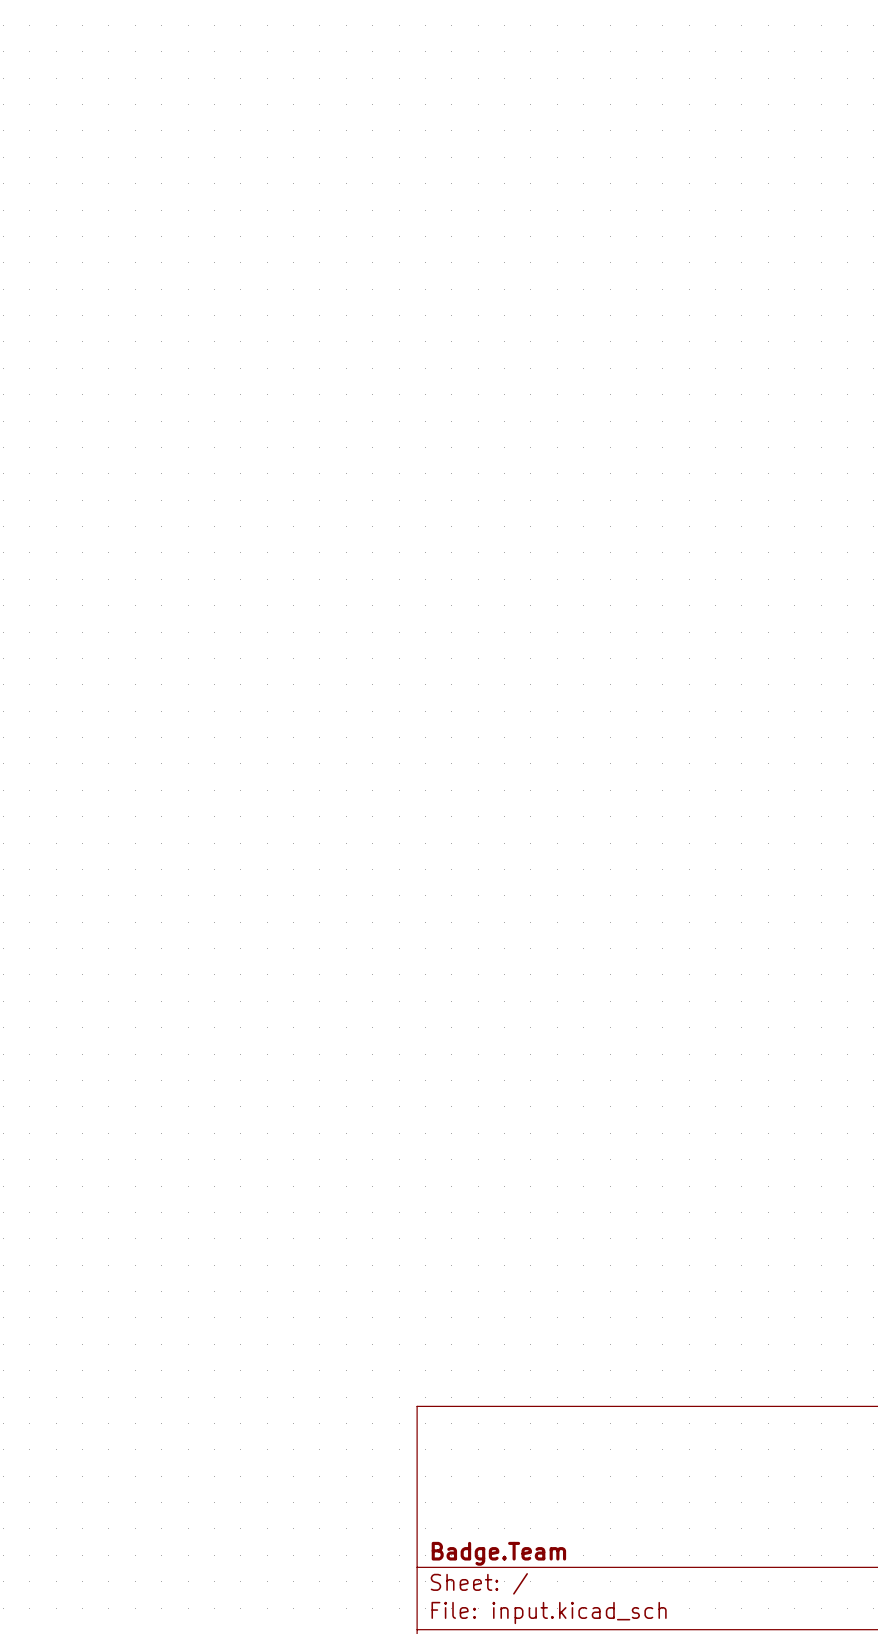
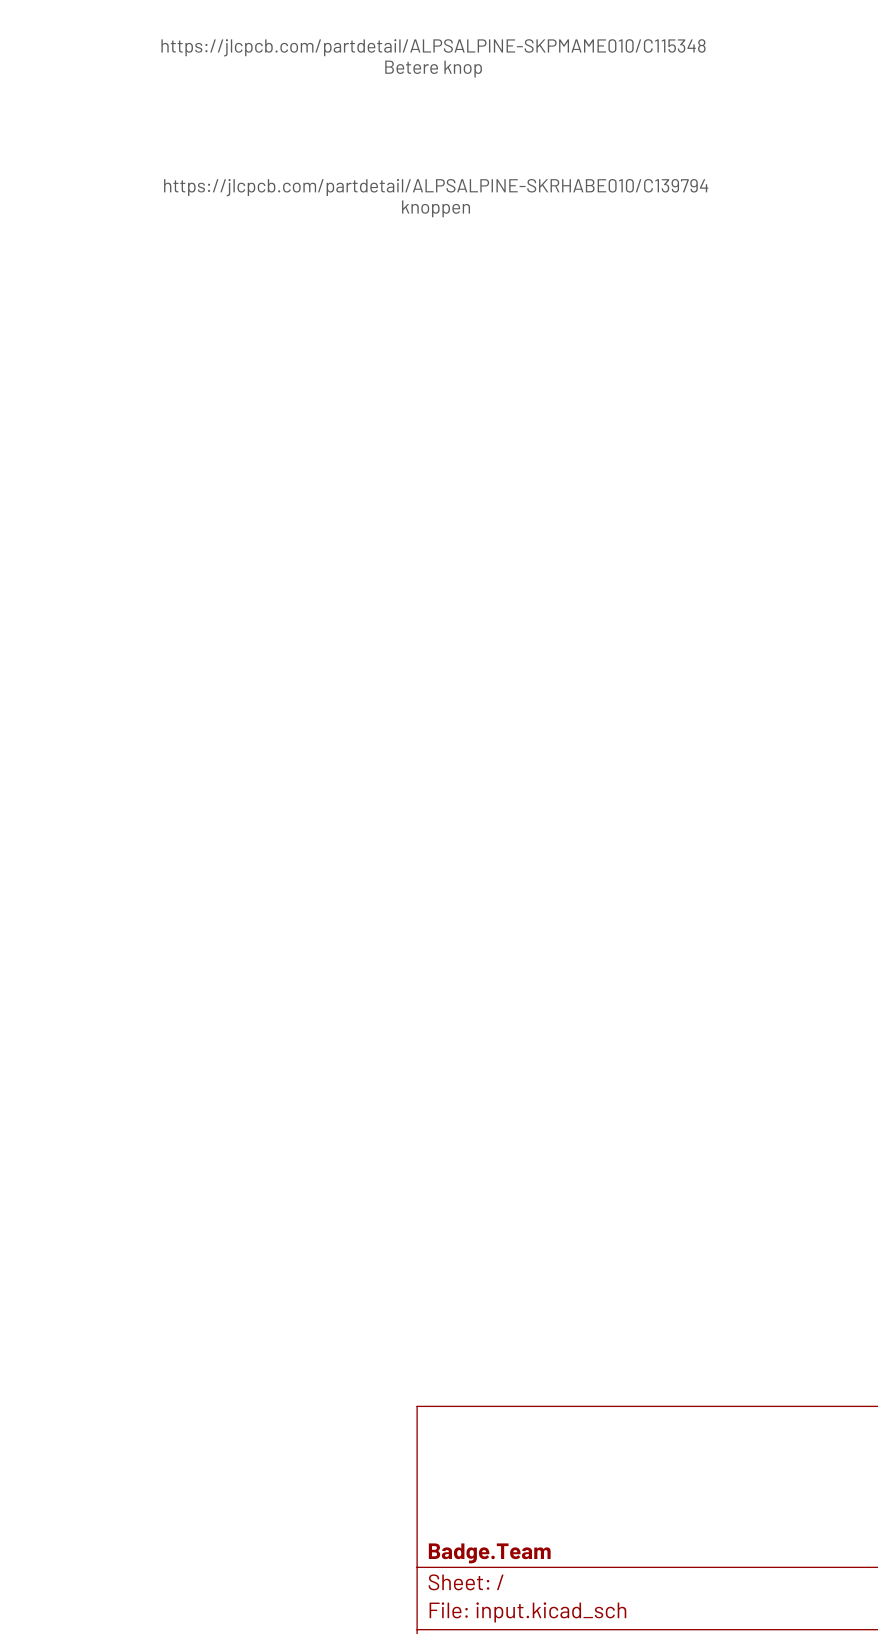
text: none -> https://jlcpcb.com/partdetail/ALPSALPINE-SKPMAME010/C115348 (433, 47)
text: none -> Betere knop (433, 69)
text: none -> https://jlcpcb.com/partdetail/ALPSALPINE-SKRHABE010/C139794 (436, 187)
text: none -> knoppen (436, 208)

